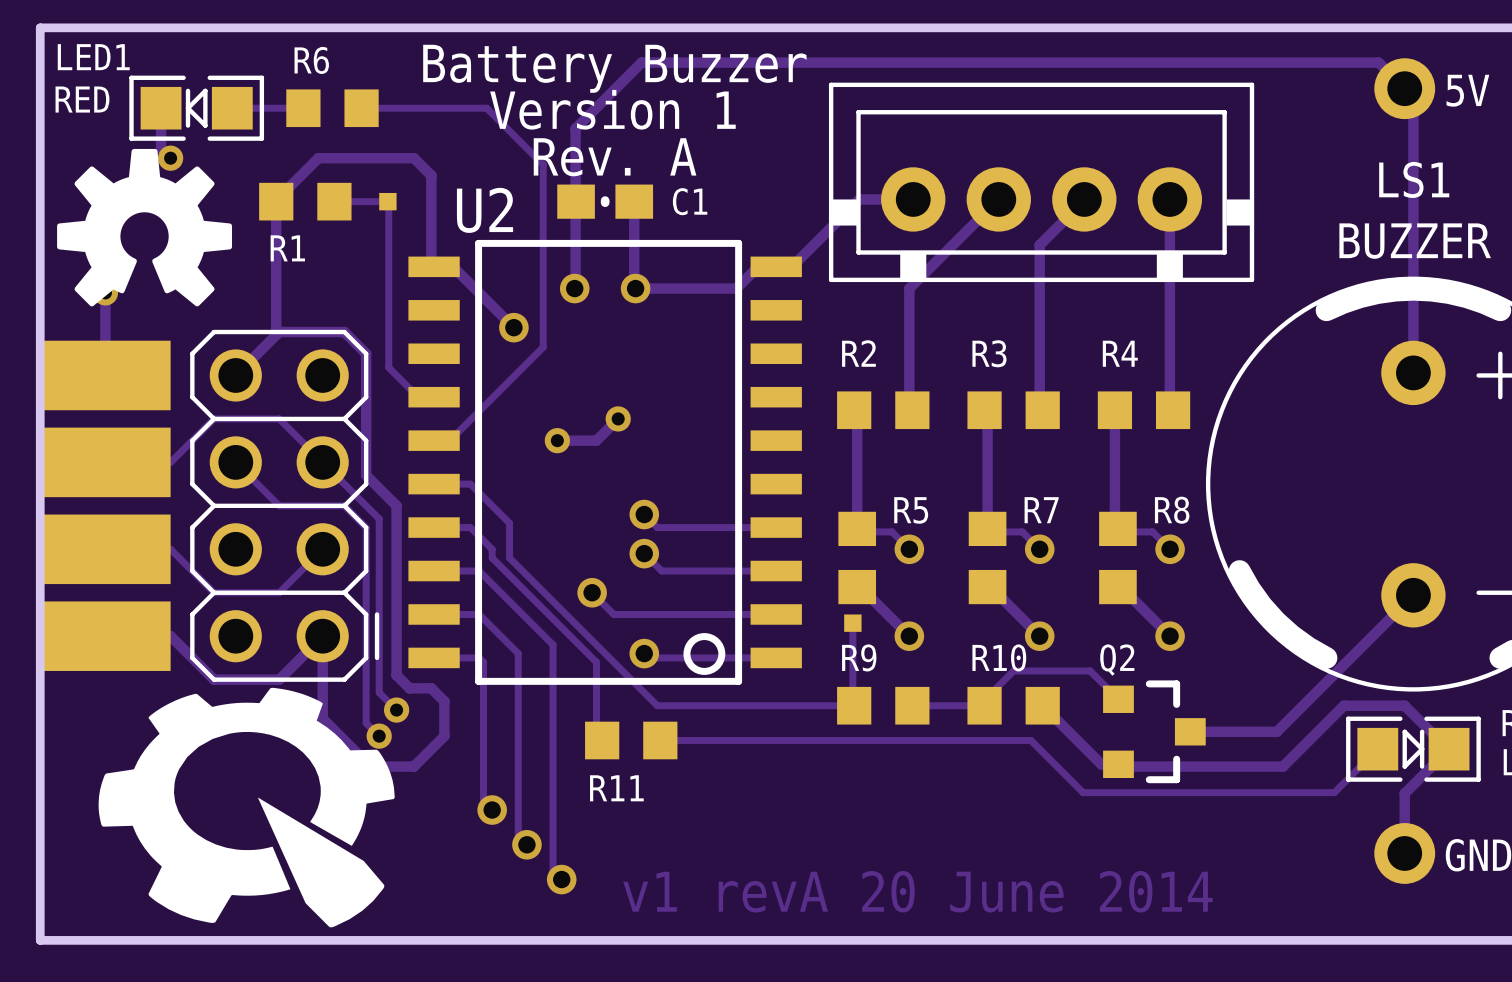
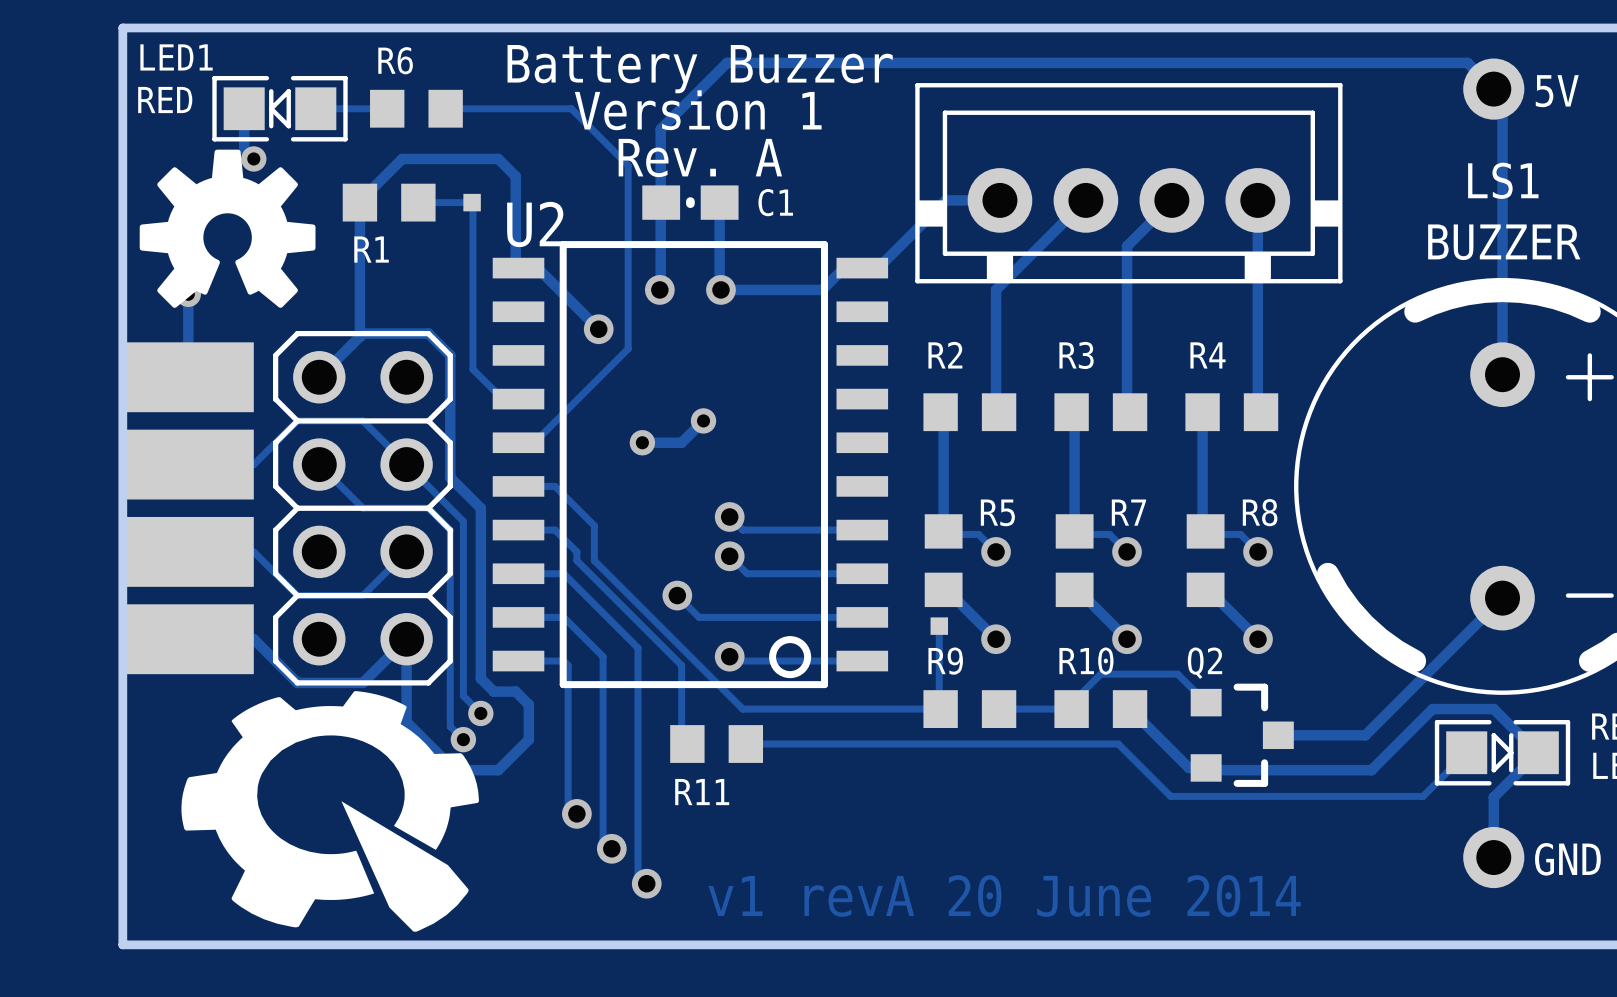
U2 name position: U2 (485, 210) -> U2 (535, 224)
part footprint: [190, 329, 380, 682] -> [273, 330, 453, 686]

